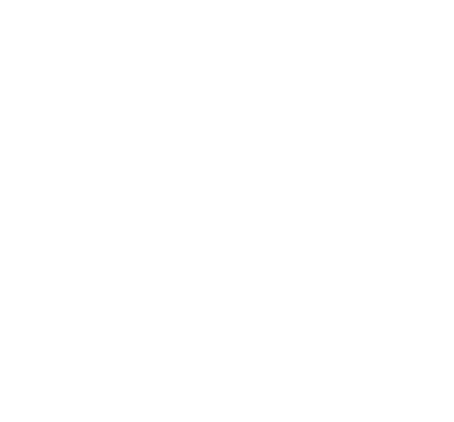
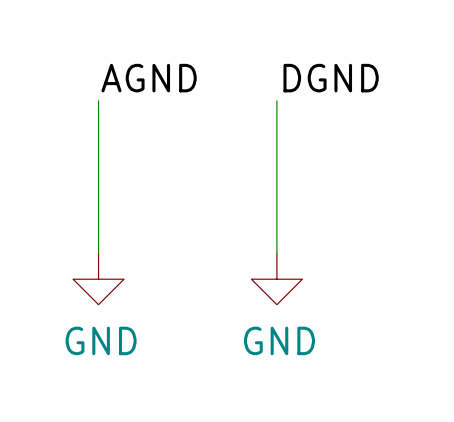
label: none -> AGND (149, 78)
label: none -> DGND (331, 78)
wire: none -> (98, 100) (98, 253)
wire: none -> (276, 100) (276, 253)
power symbol: none -> GND (98, 279)
power symbol: none -> GND (276, 279)

